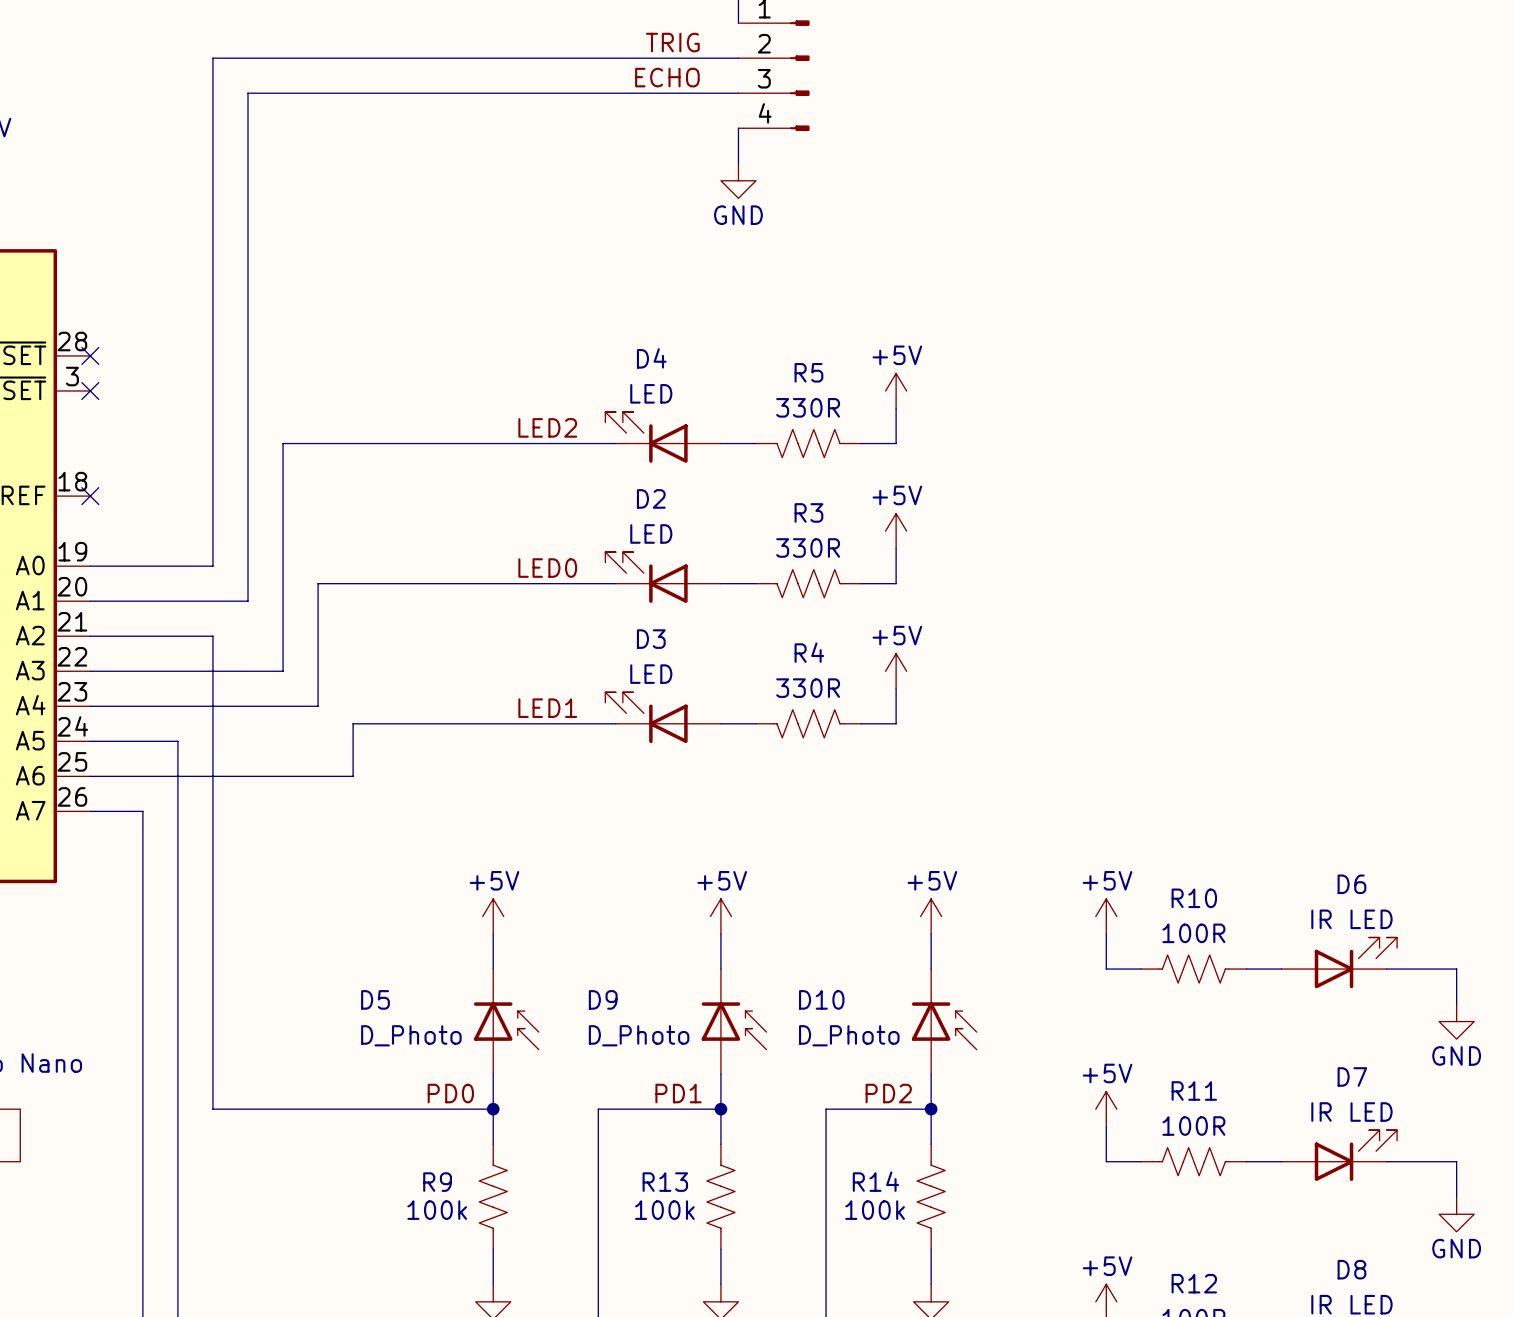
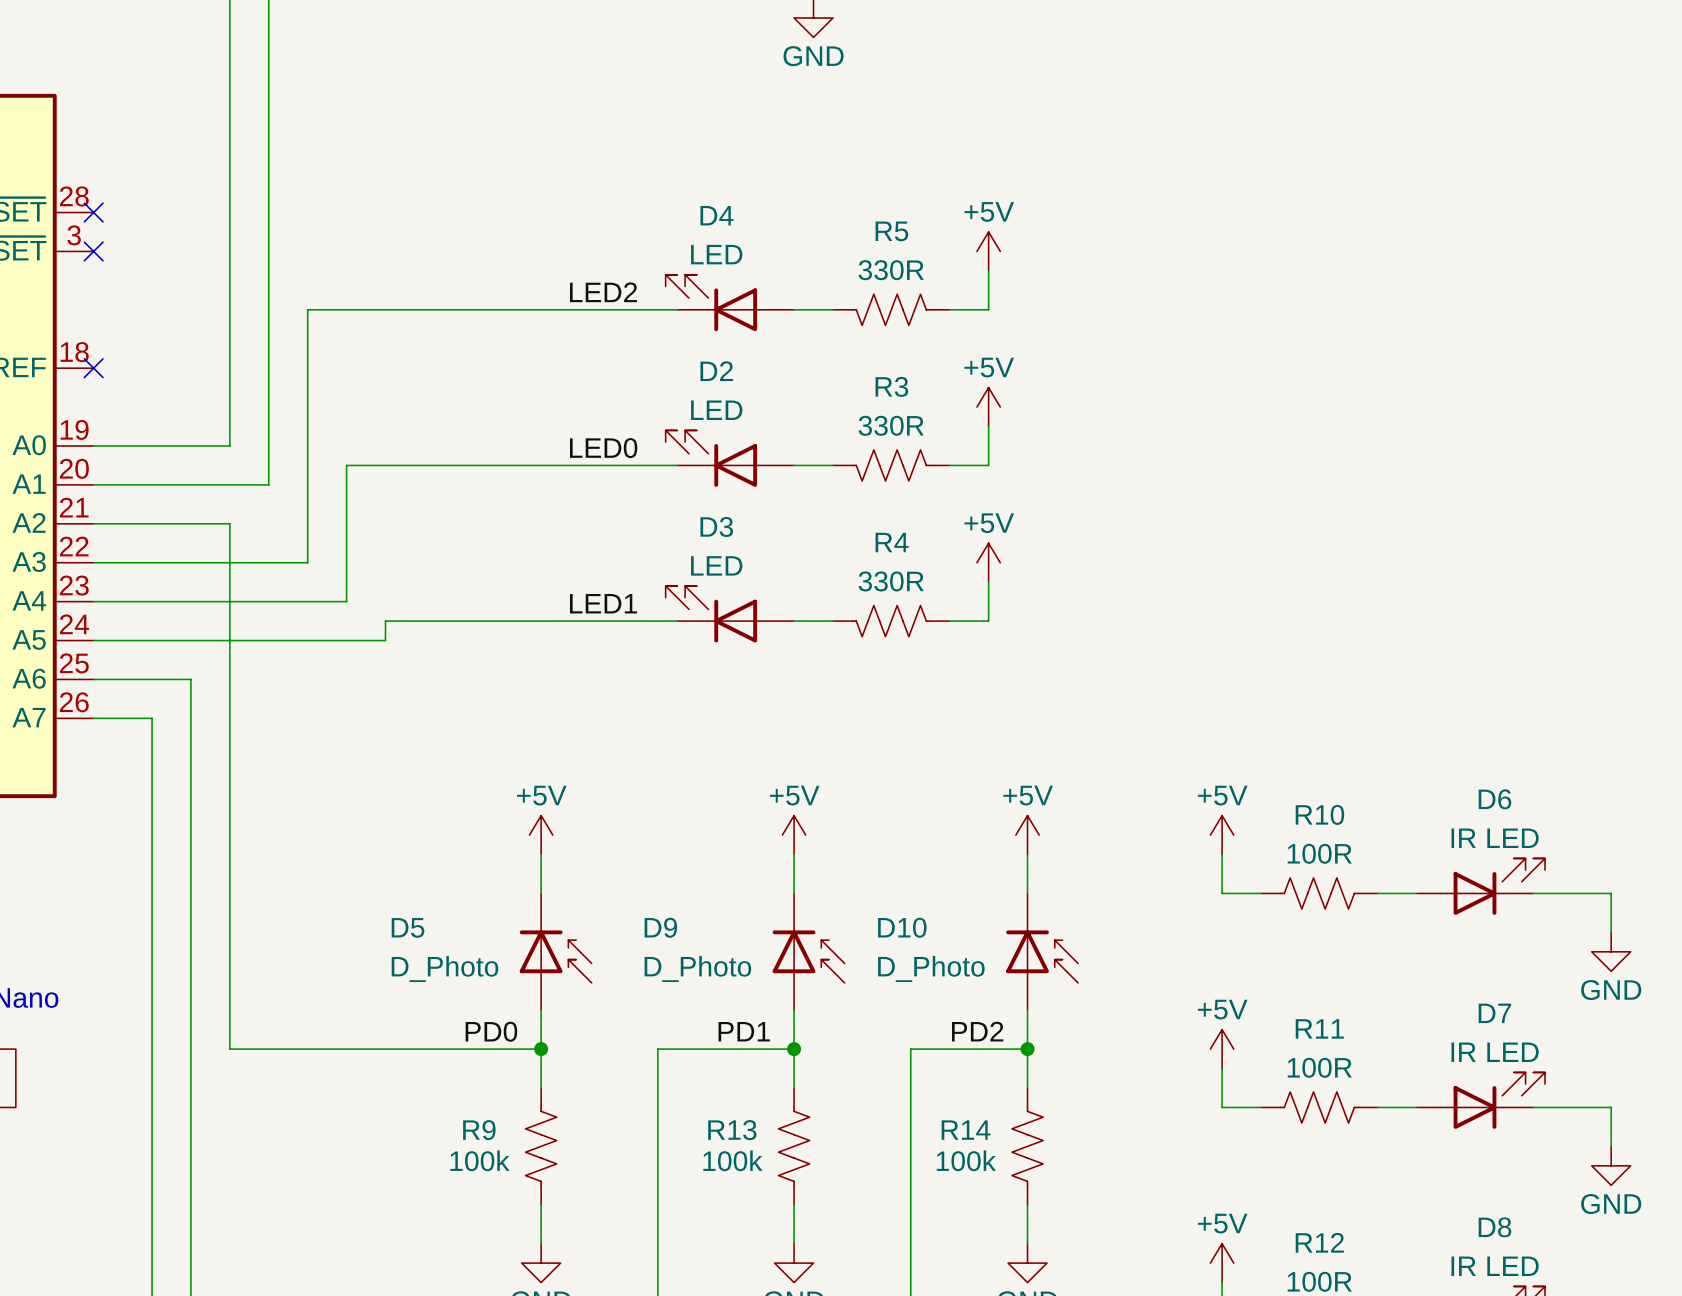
wire: (177, 741) (177, 776) (353, 776) (353, 741) -> (190, 640) (385, 640)

